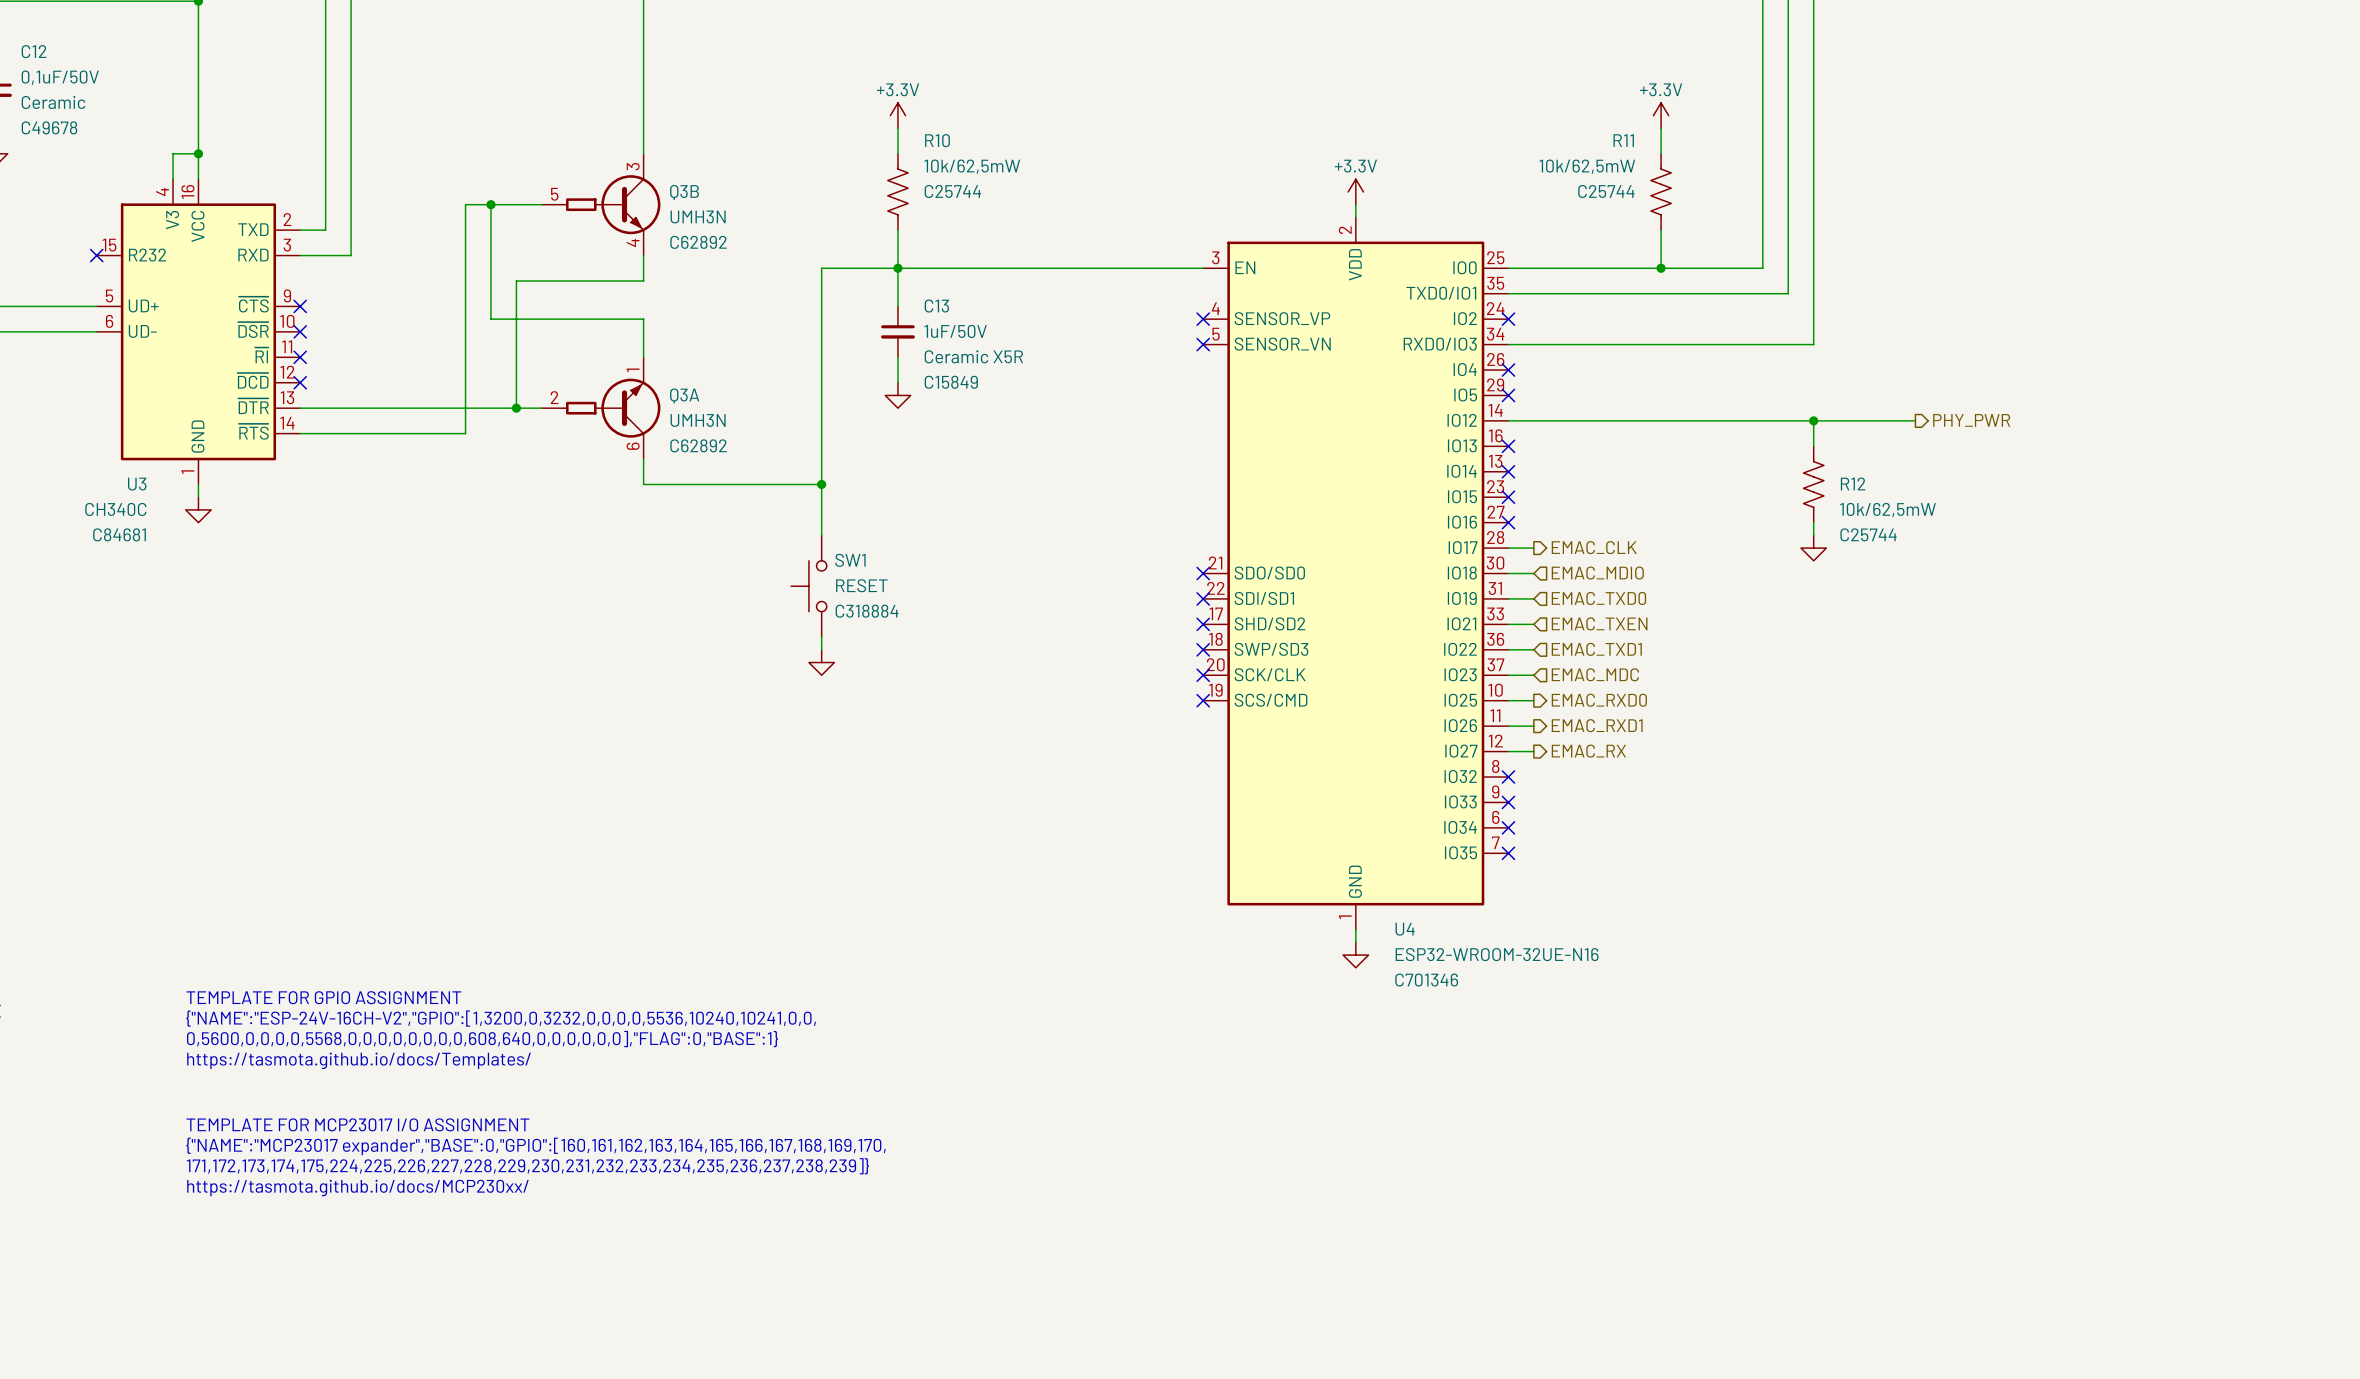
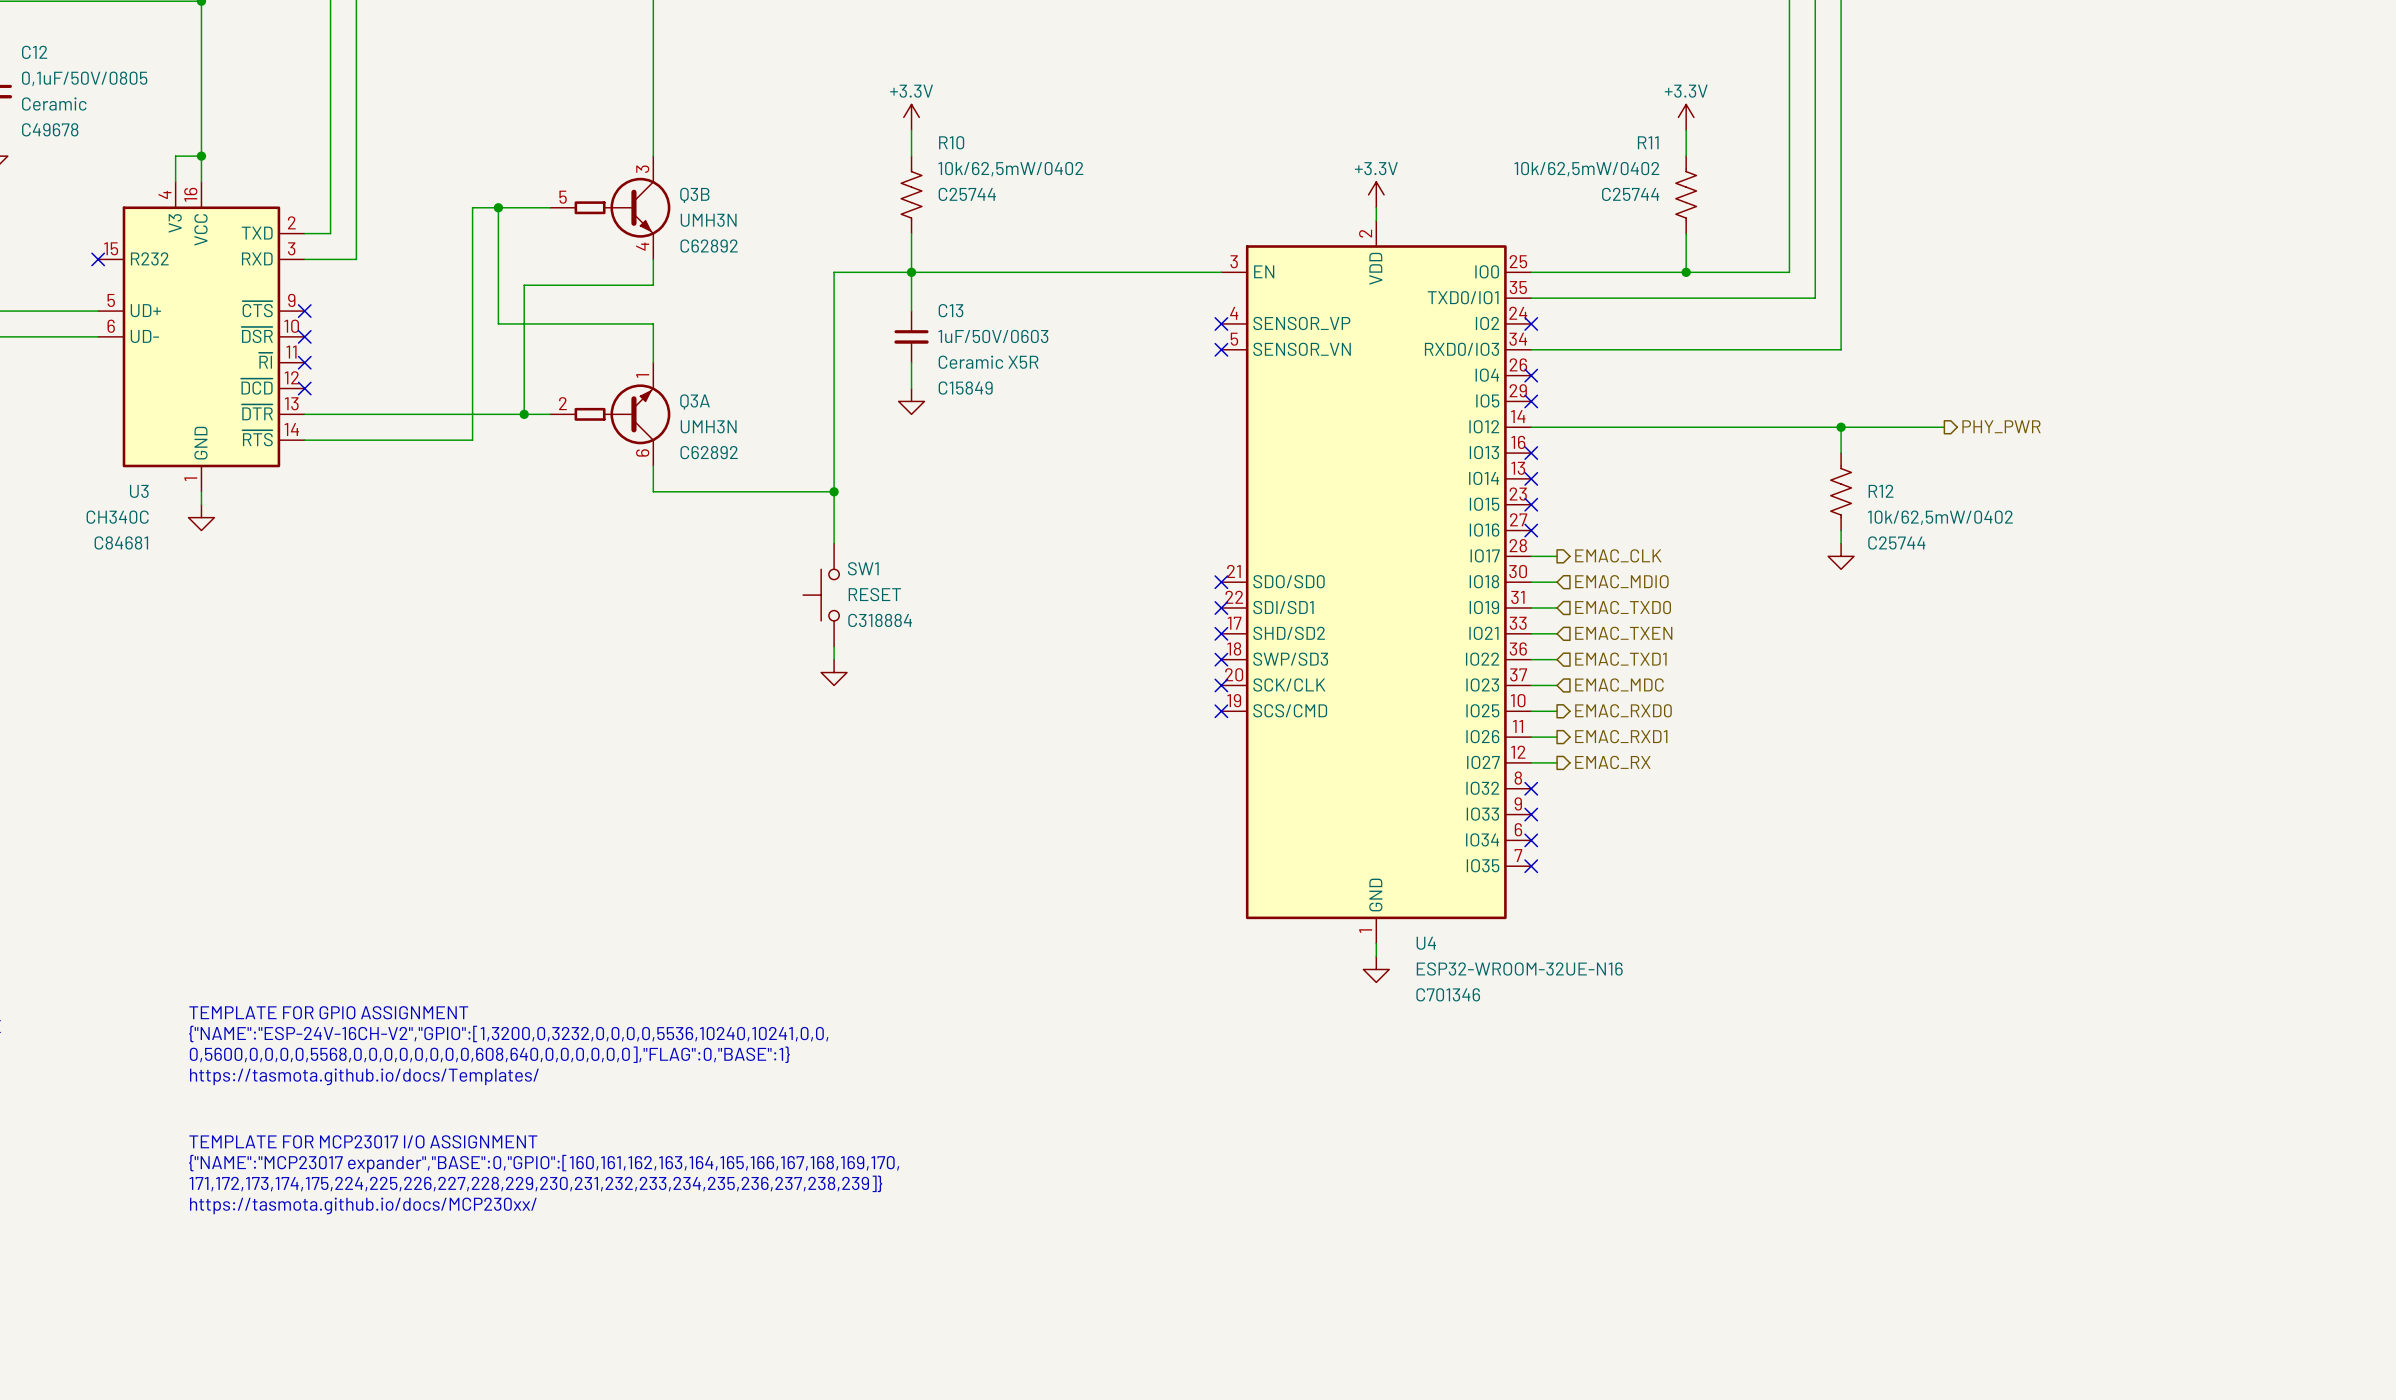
C12 value: 0,1uF/50V (60, 77) -> 0,1uF/50V/0805 (84, 78)
R10 value: 10k/62,5mW (972, 166) -> 10k/62,5mW/0402 (1010, 169)
R11 value: 10k/62,5mW (1587, 166) -> 10k/62,5mW/0402 (1586, 169)
C13 value: 1uF/50V (955, 331) -> 1uF/50V/0603 (993, 336)
R12 value: 10k/62,5mW (1888, 510) -> 10k/62,5mW/0402 (1940, 517)

